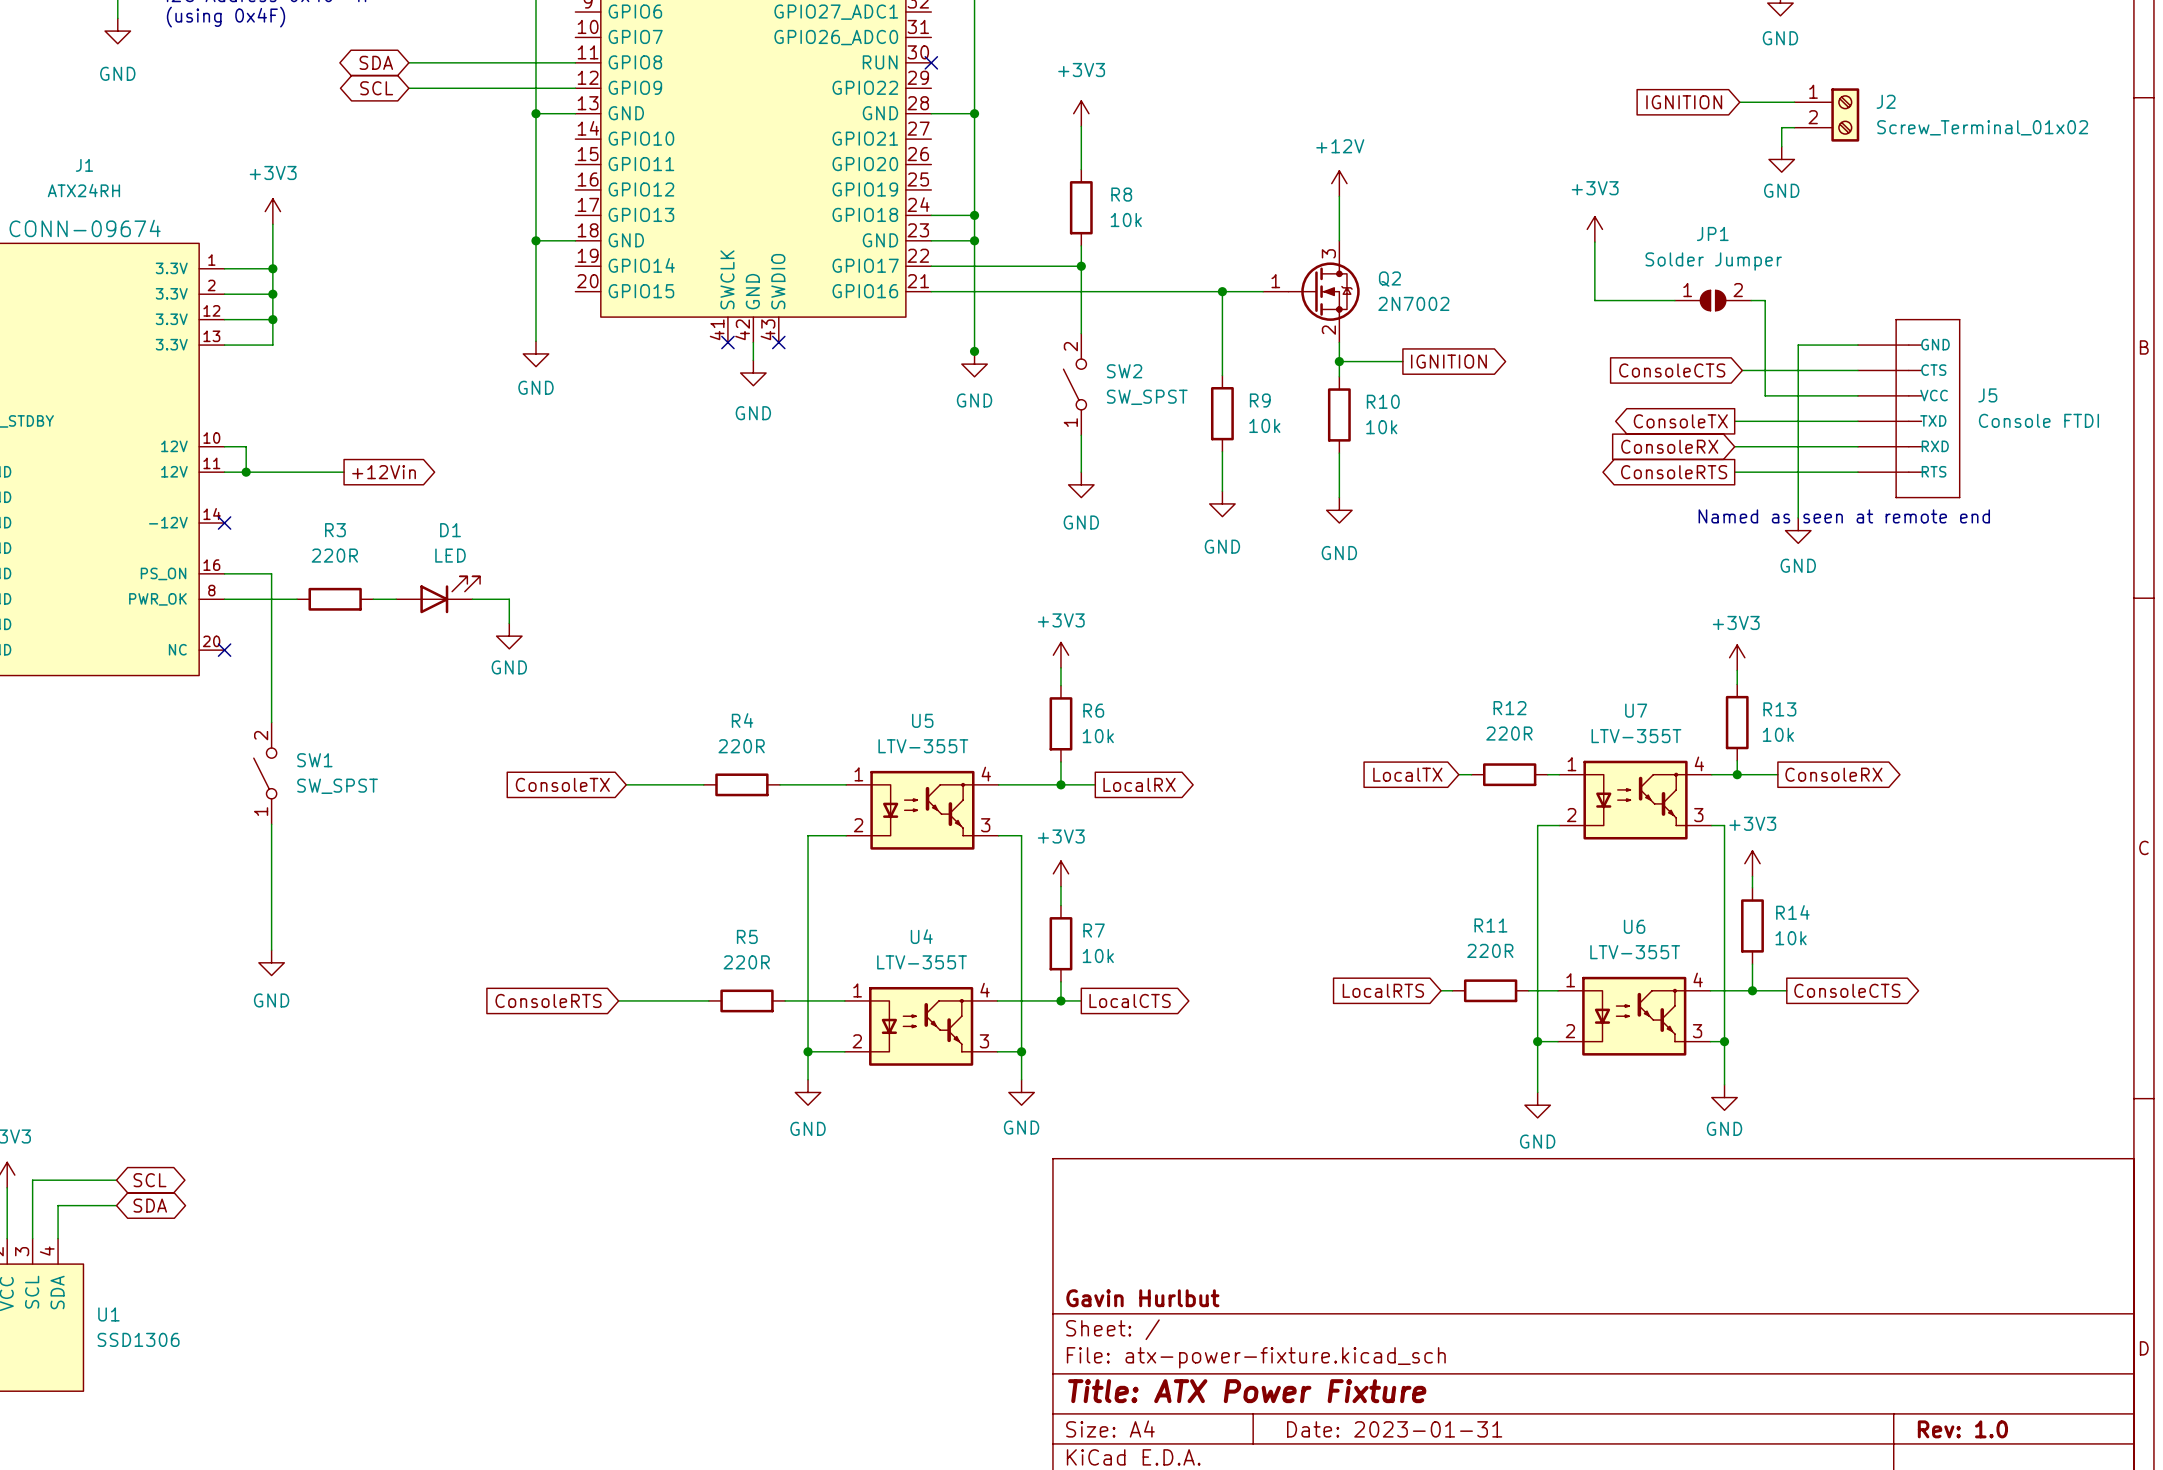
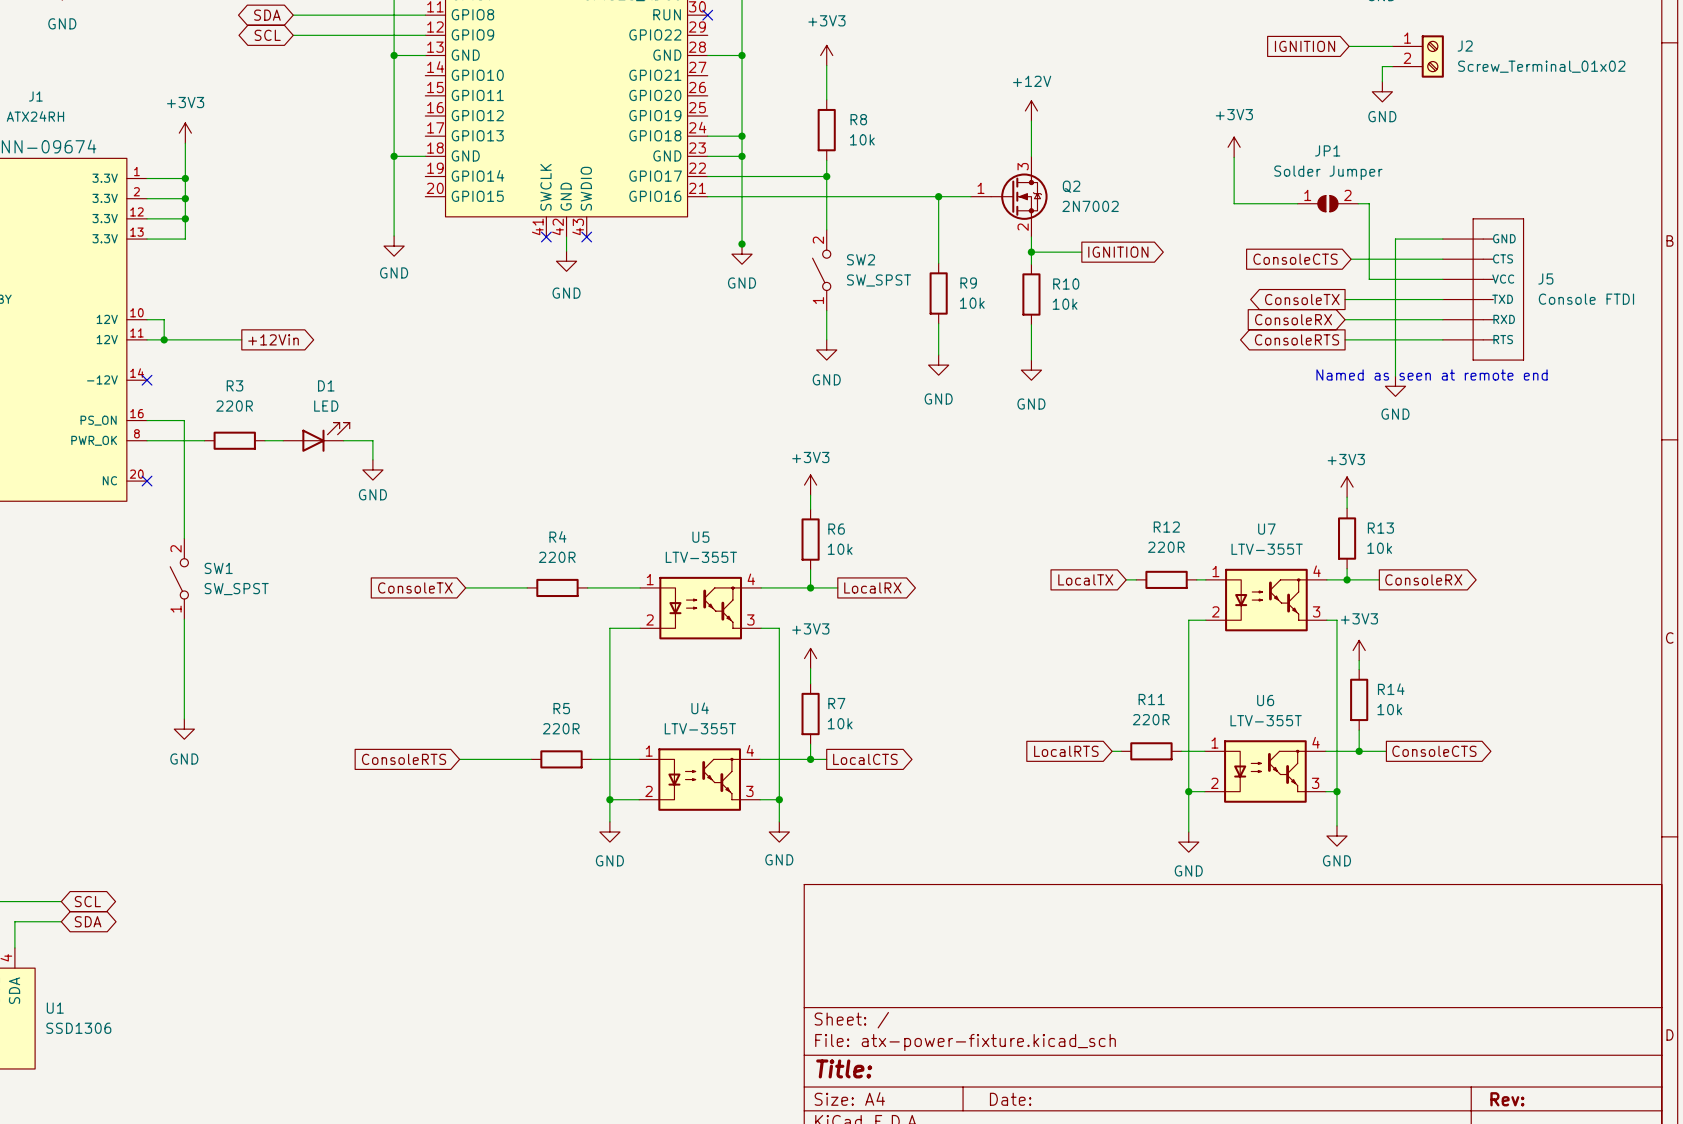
title block: Gavin Hurlbut (1142, 1298) -> none
title block: Title: ATX Power Fixture (1247, 1391) -> Title: (844, 1068)
title block: Date: 2023-01-31 (1394, 1429) -> Date: (1010, 1099)
title block: Rev: 1.0 (1962, 1429) -> Rev: (1507, 1099)

